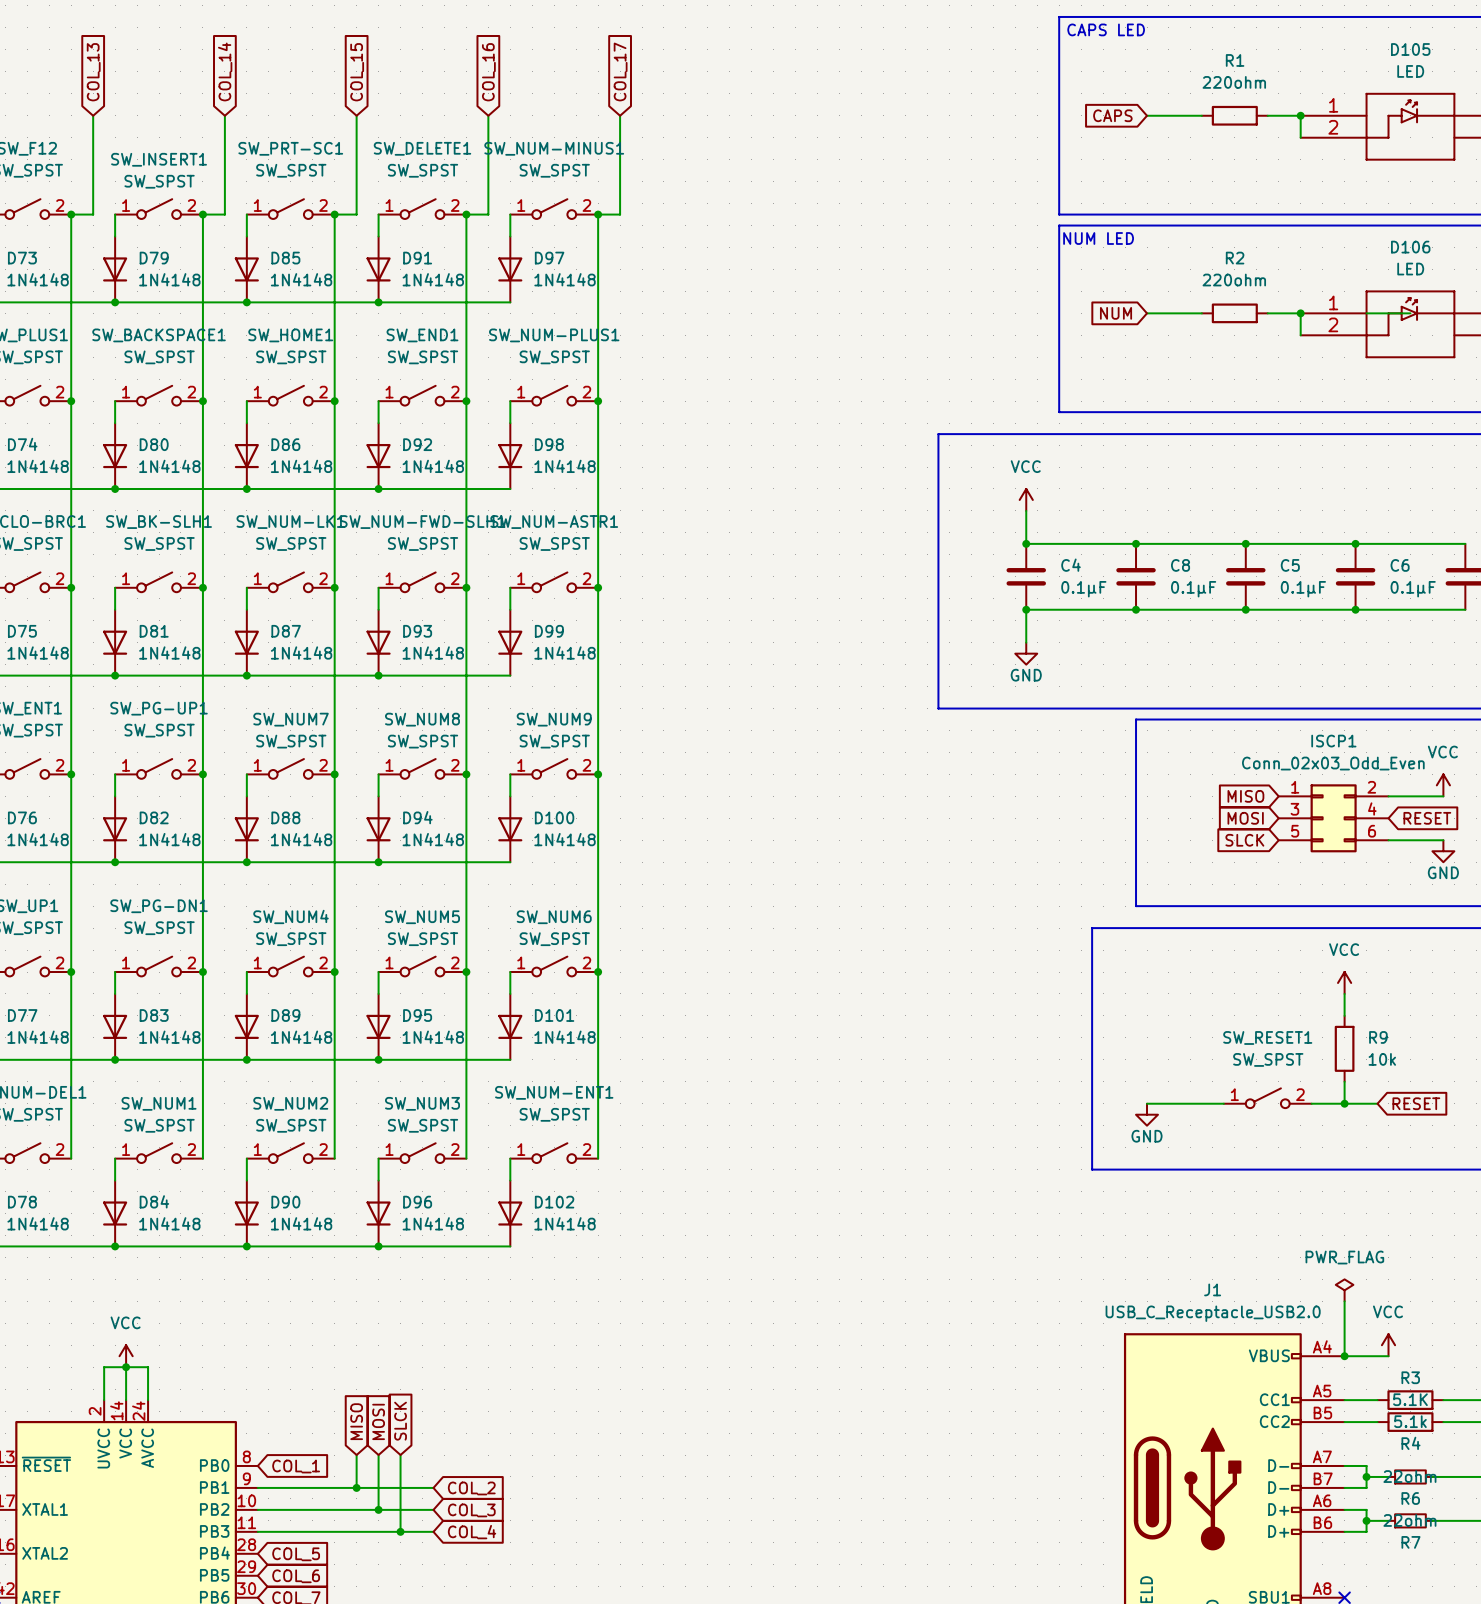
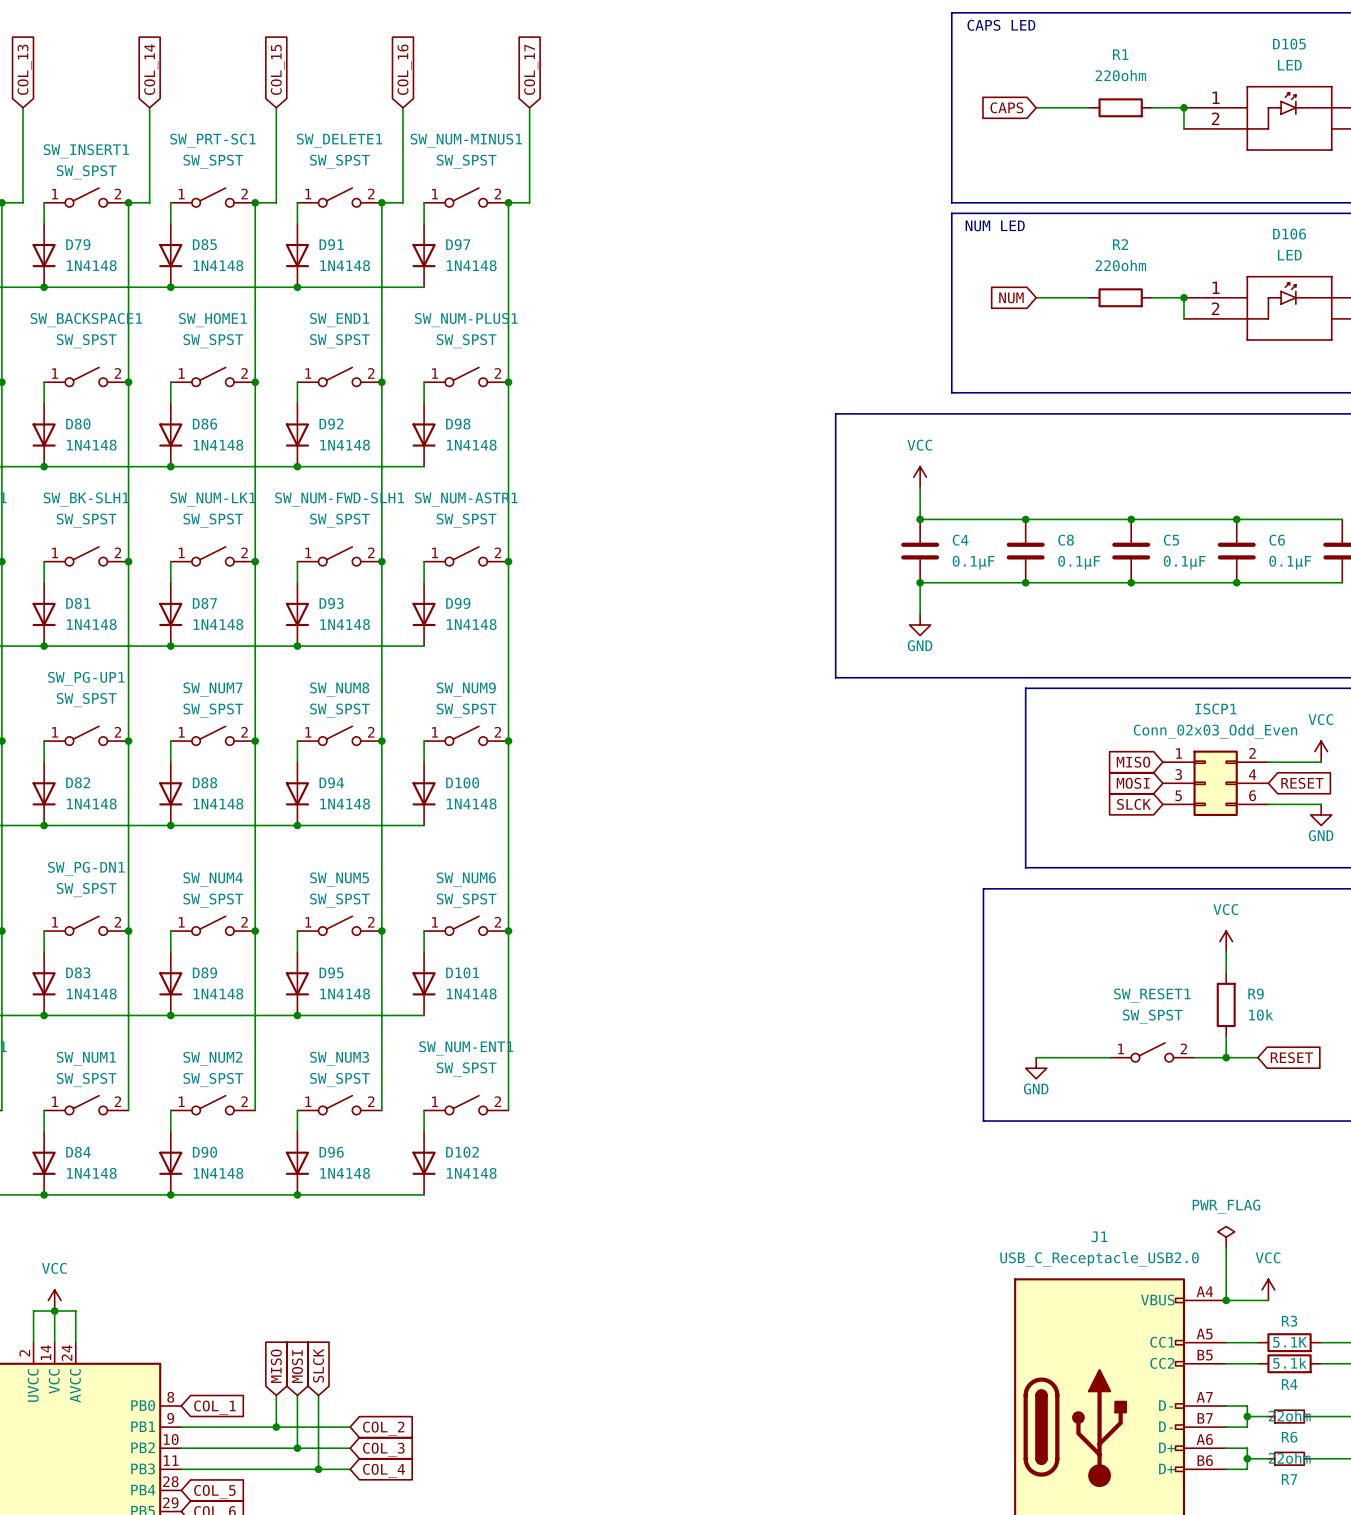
wire: (1366, 313) (1410, 313) -> none

